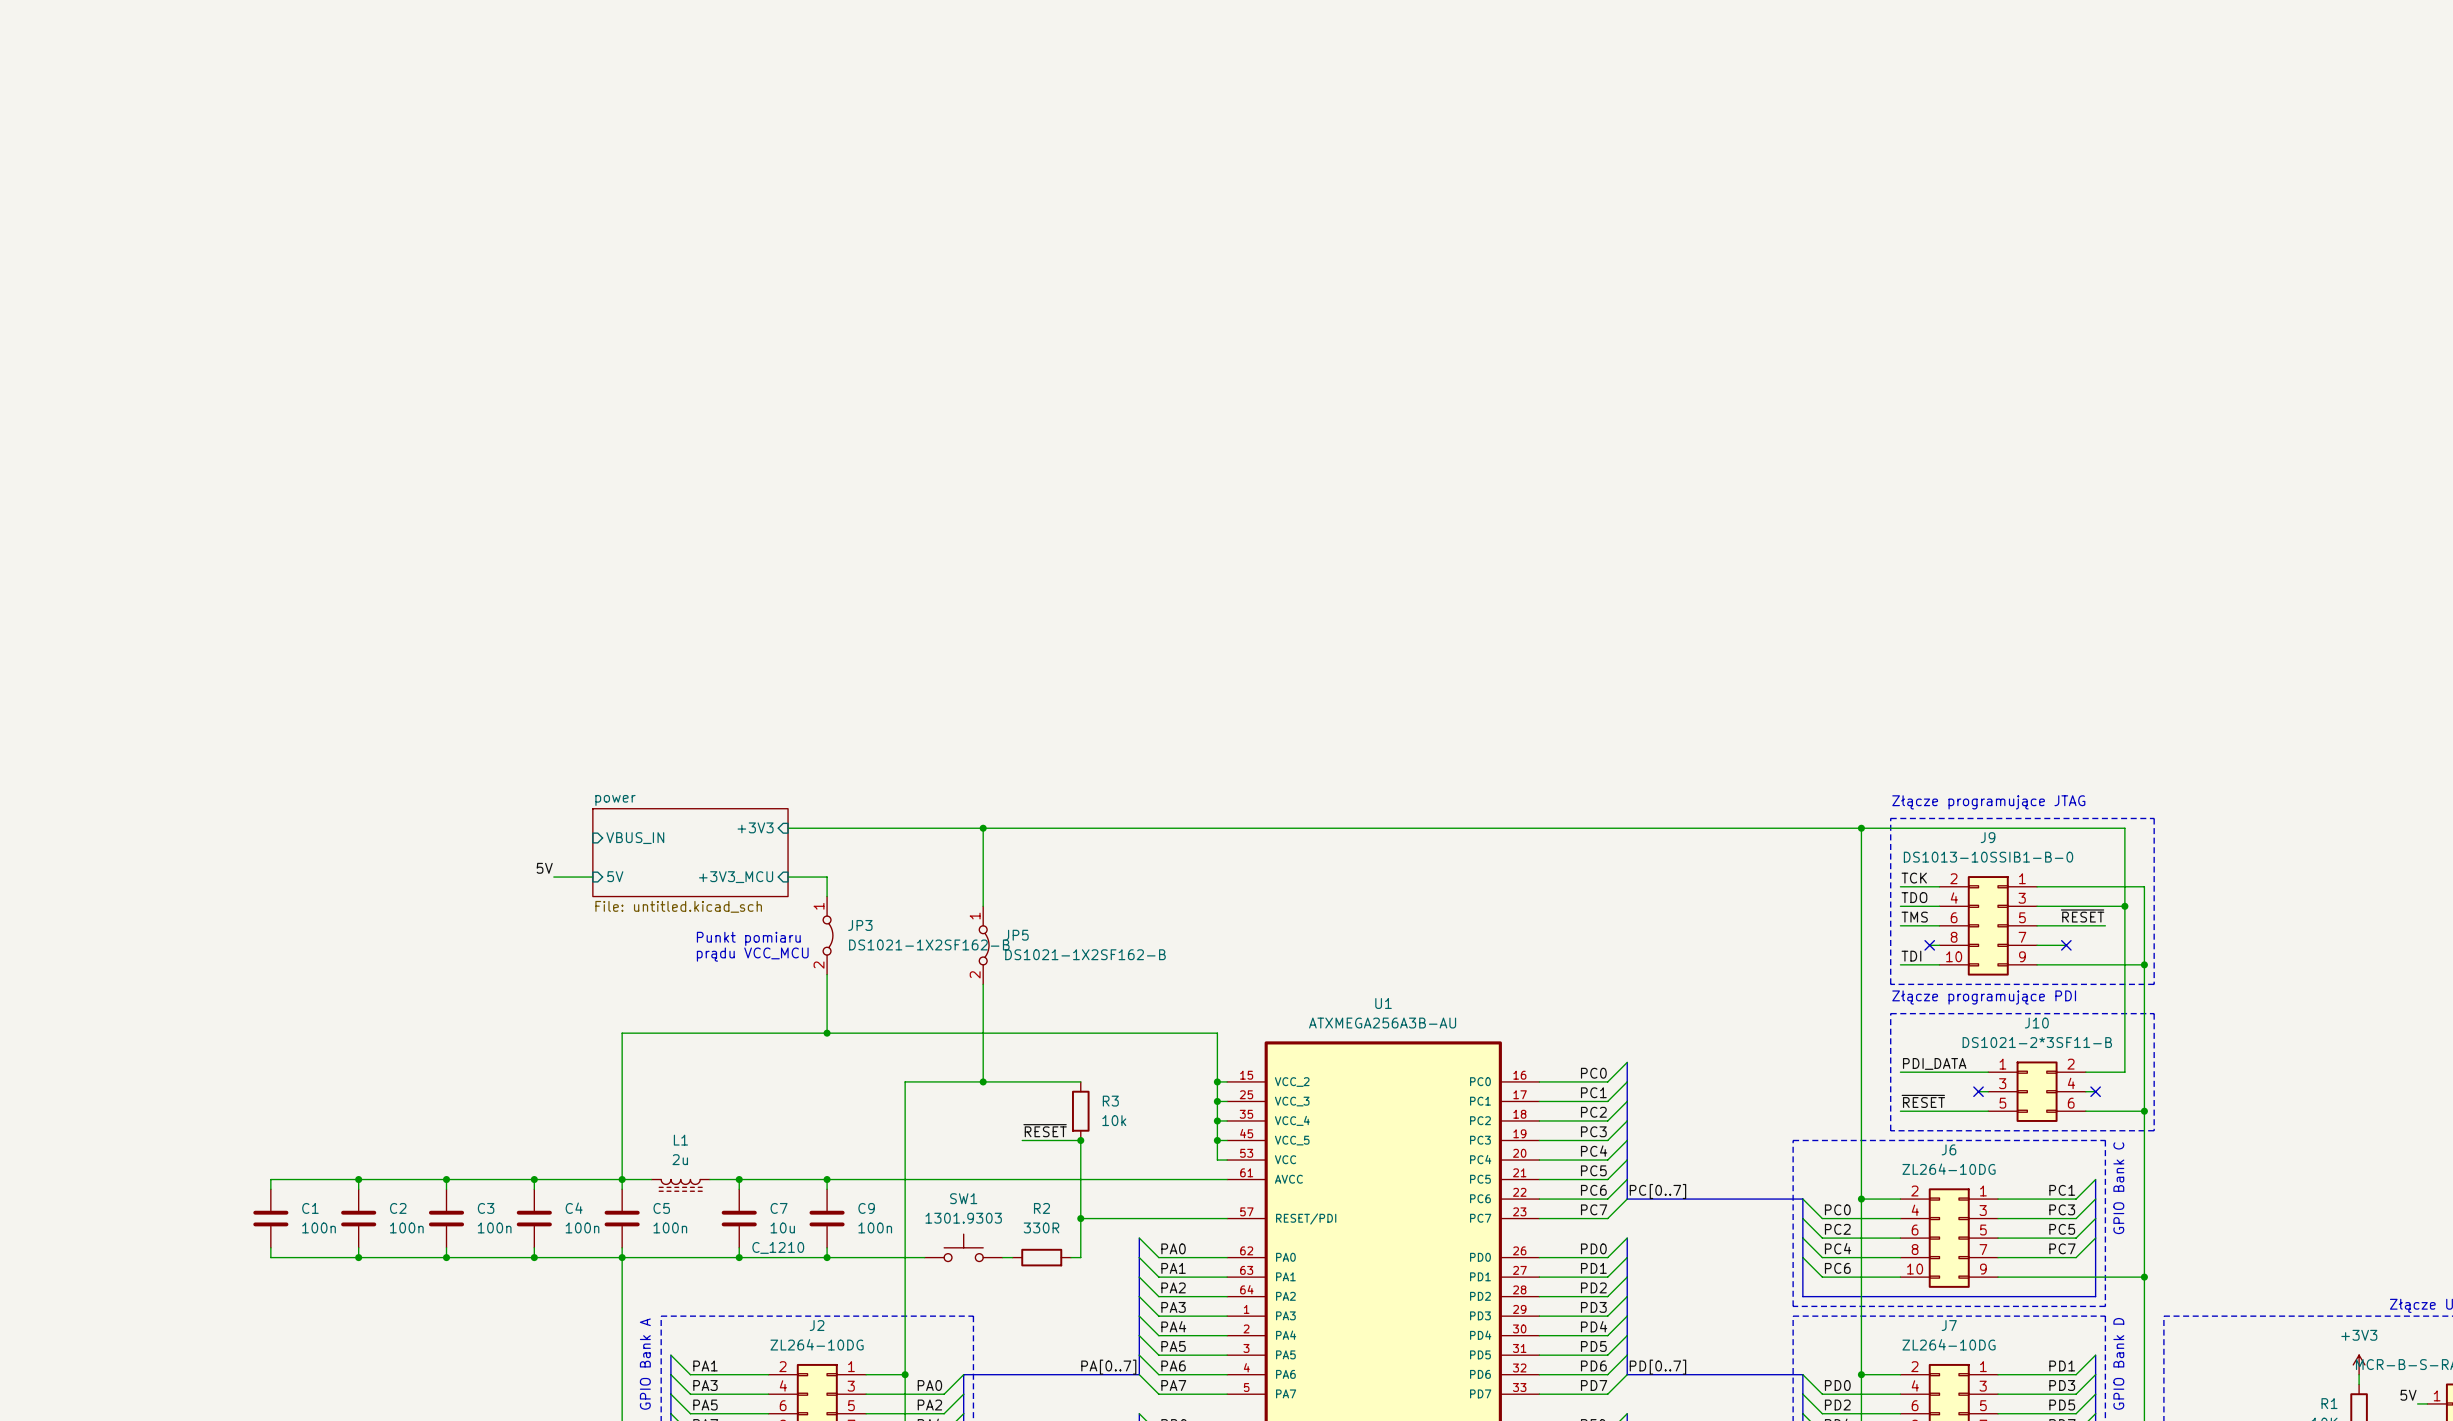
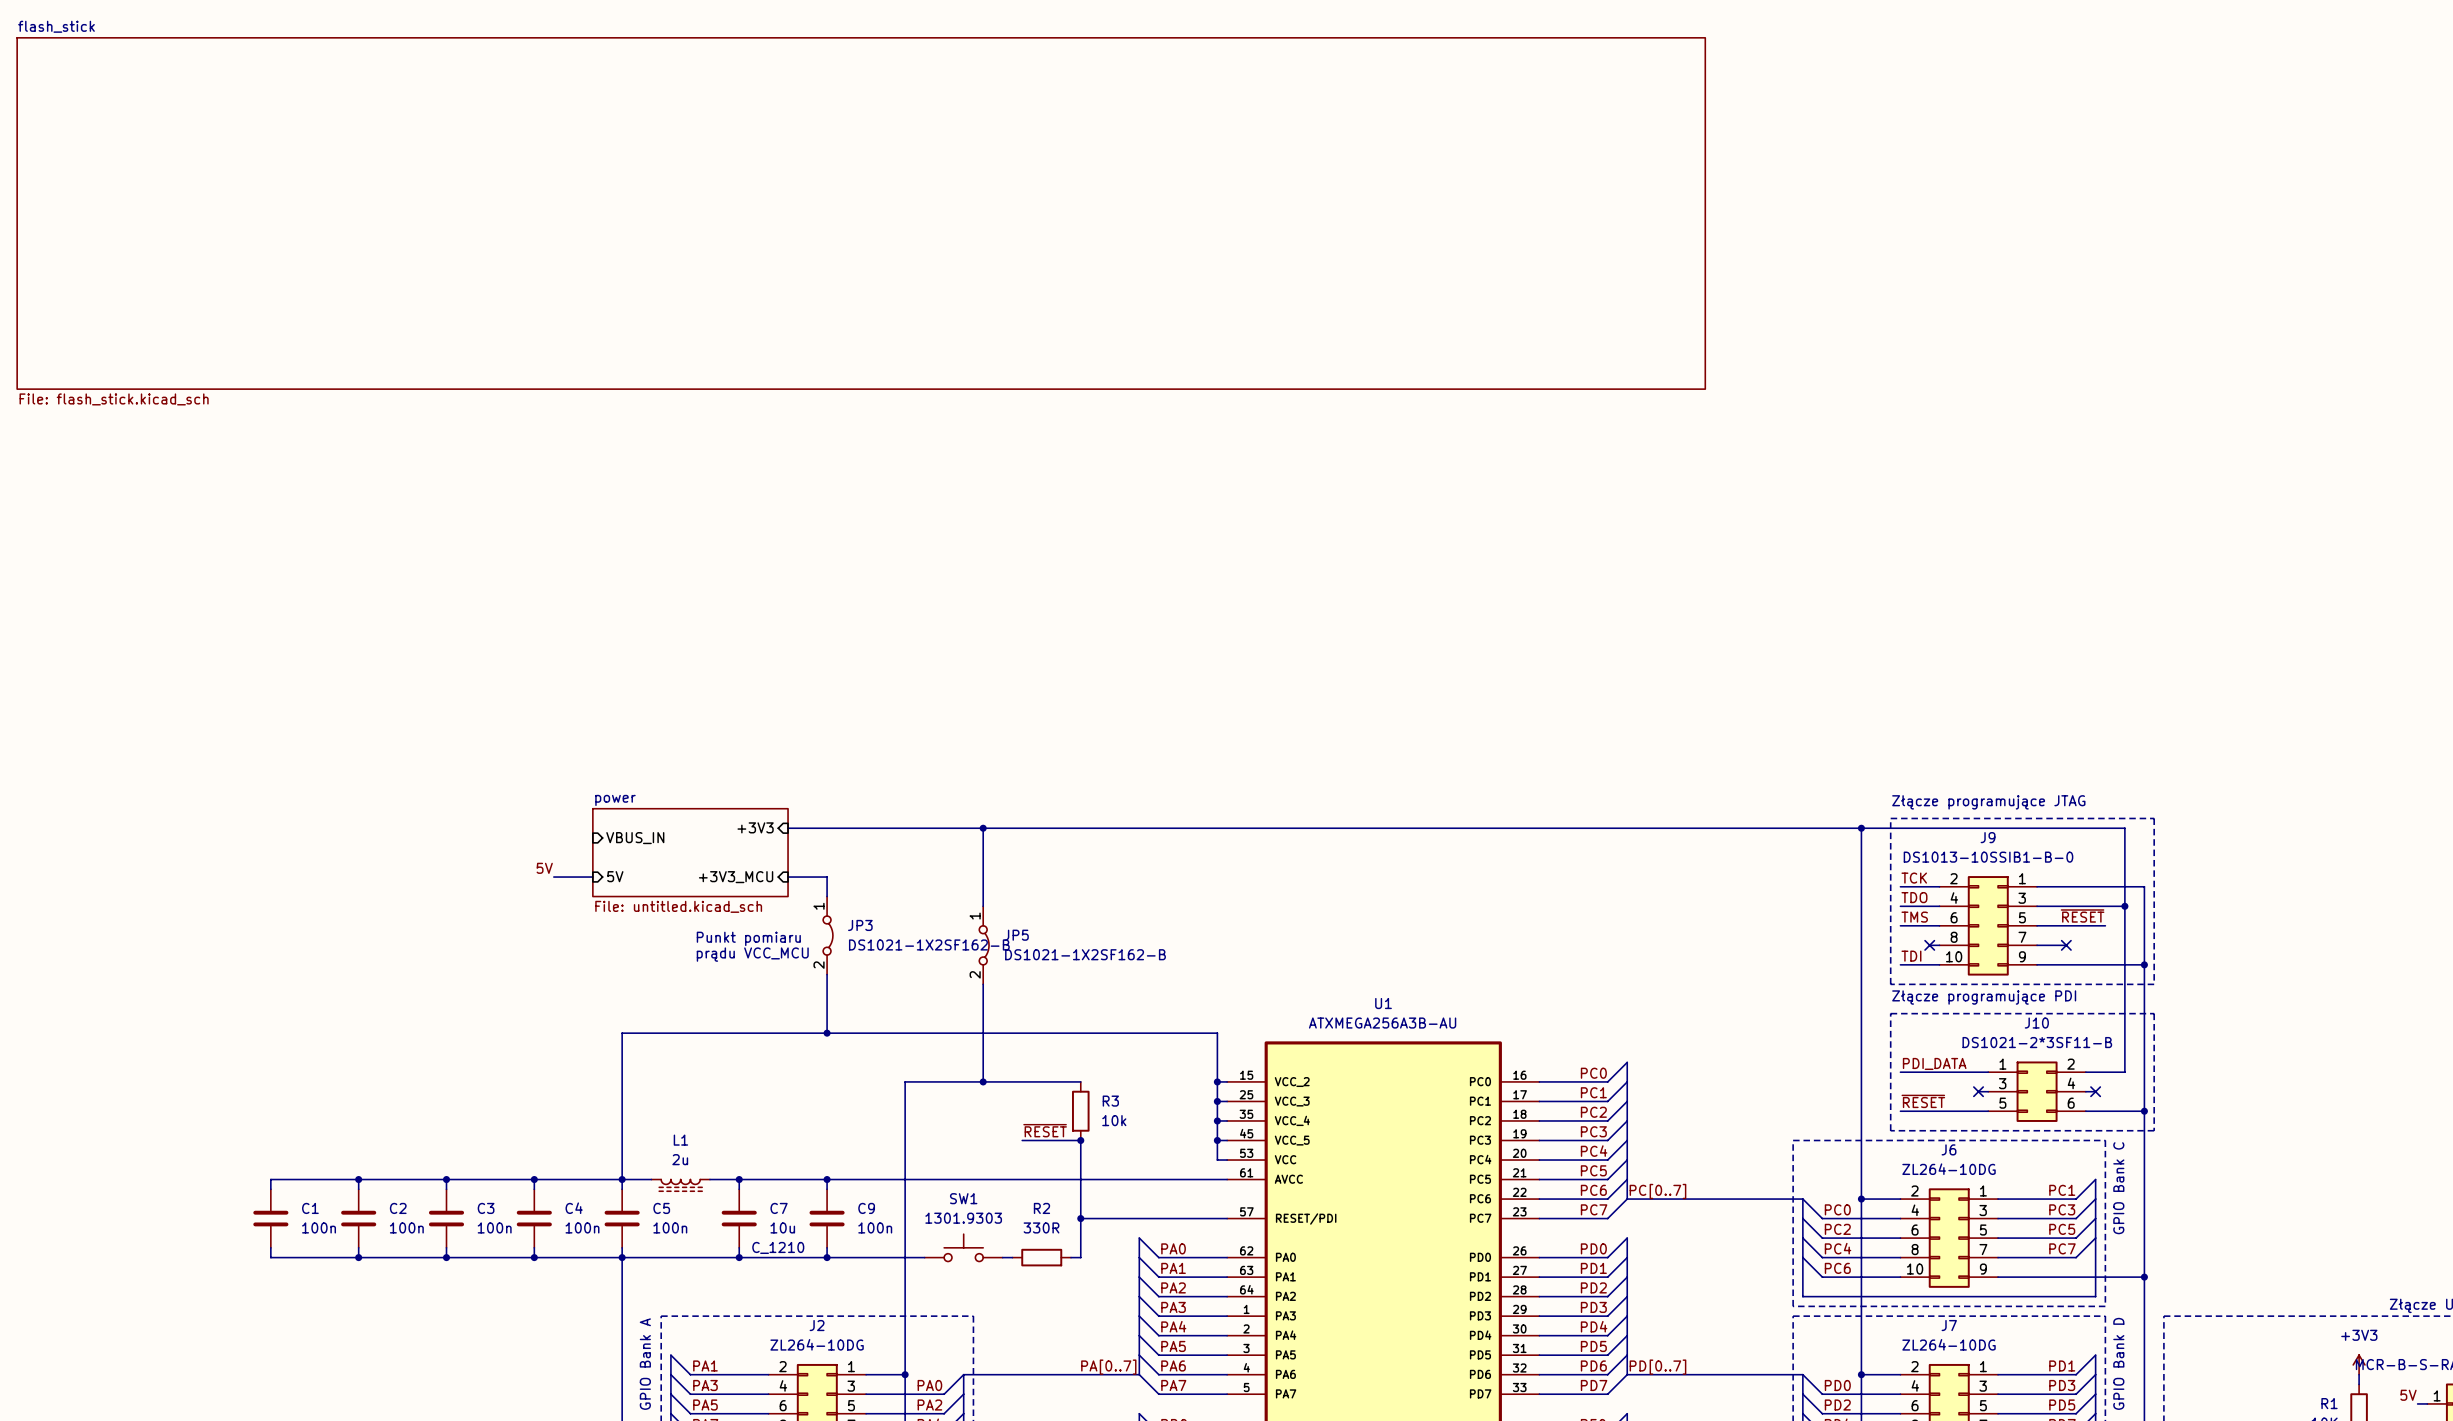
sheet flash_stick: none -> File: flash_stick.kicad_sch (861, 213)

